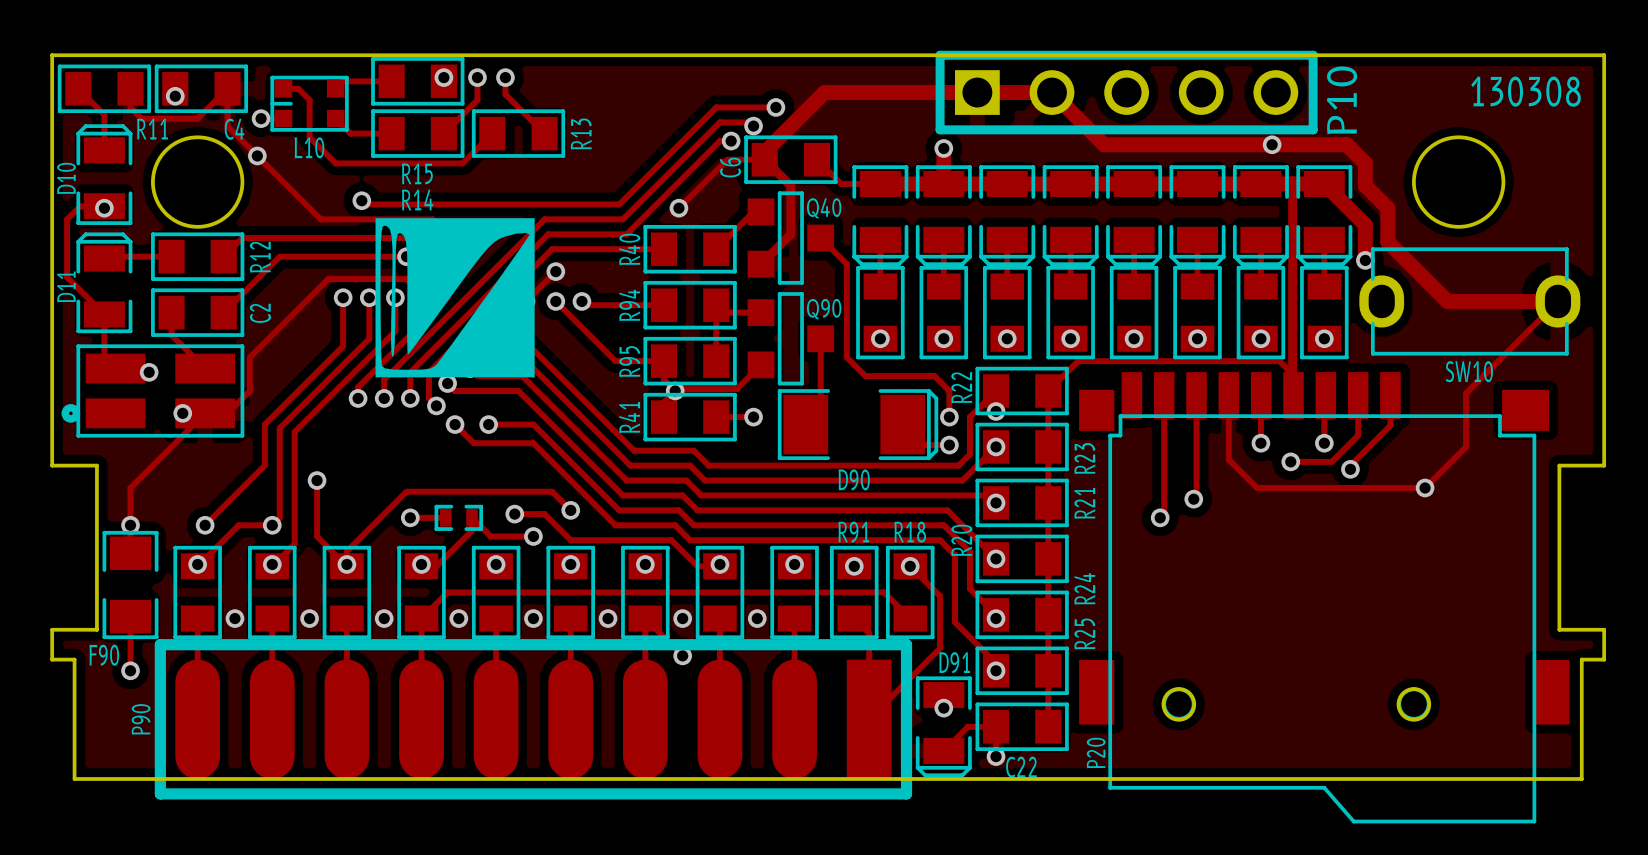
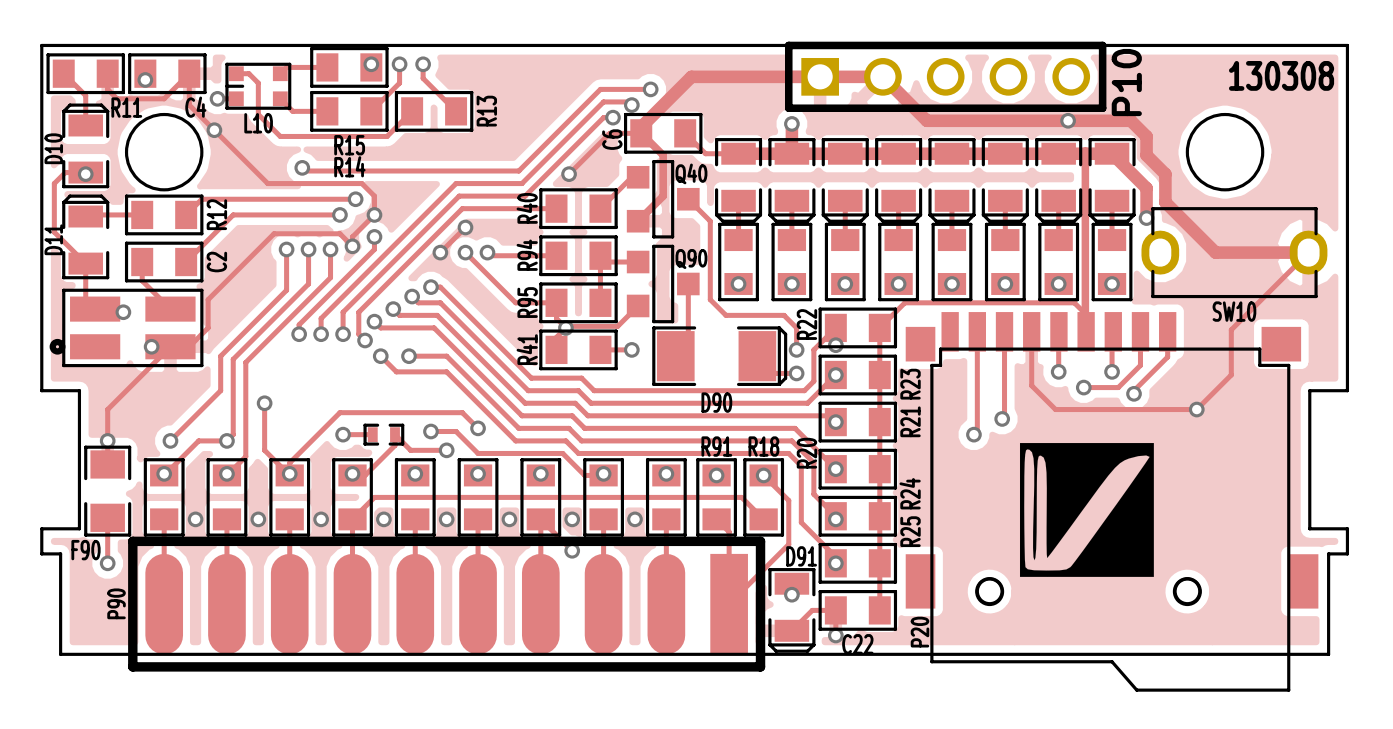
drawing: [375, 218, 535, 378] -> none
drawing: none -> [1019, 443, 1154, 577]

